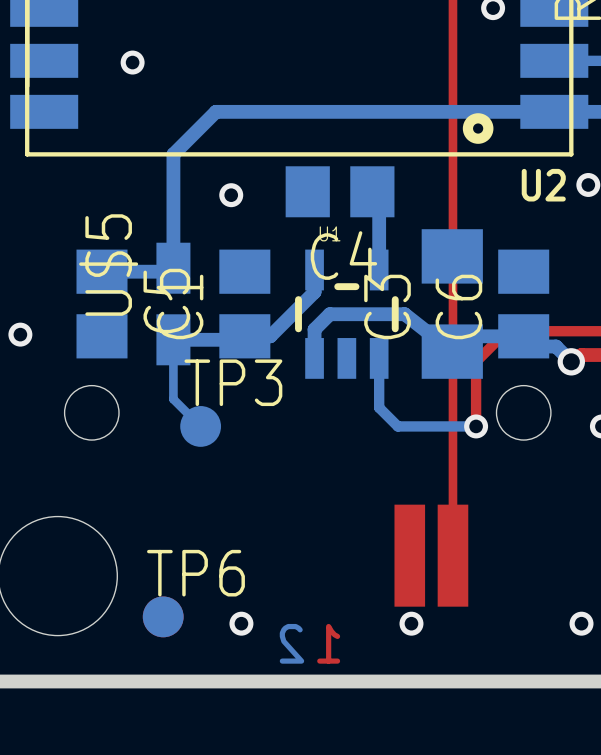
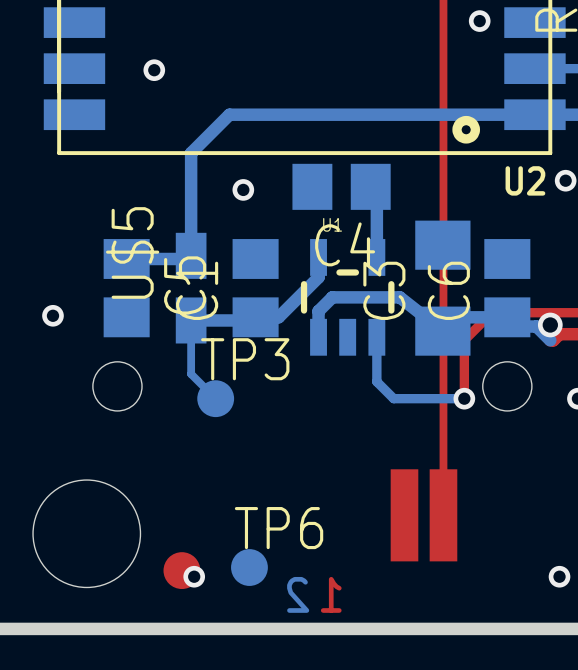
via position: (571, 361) -> (550, 324)
TP6 position: (163, 616) -> (249, 567)
via position: (241, 623) -> (194, 576)
via: (411, 623) -> none

